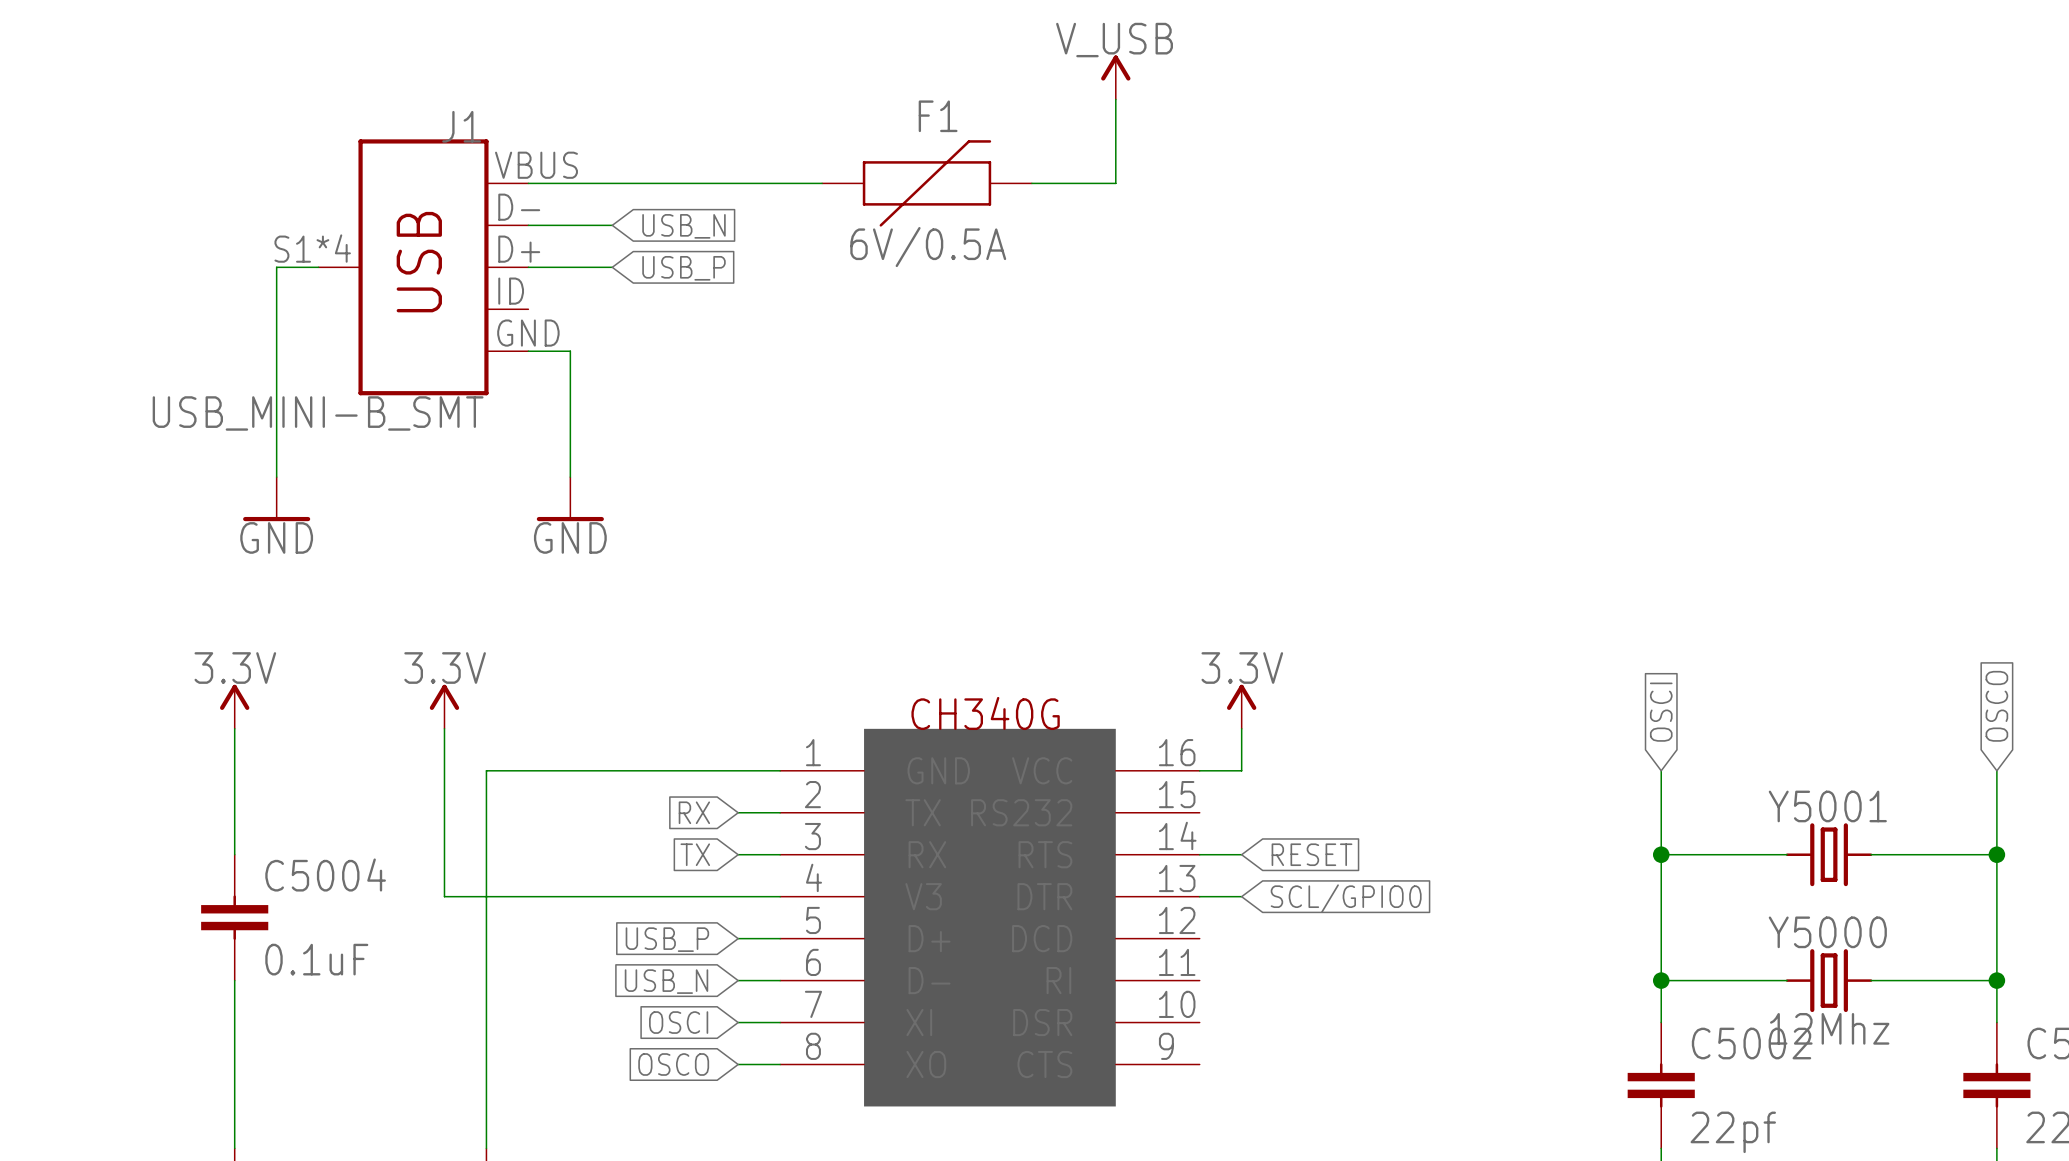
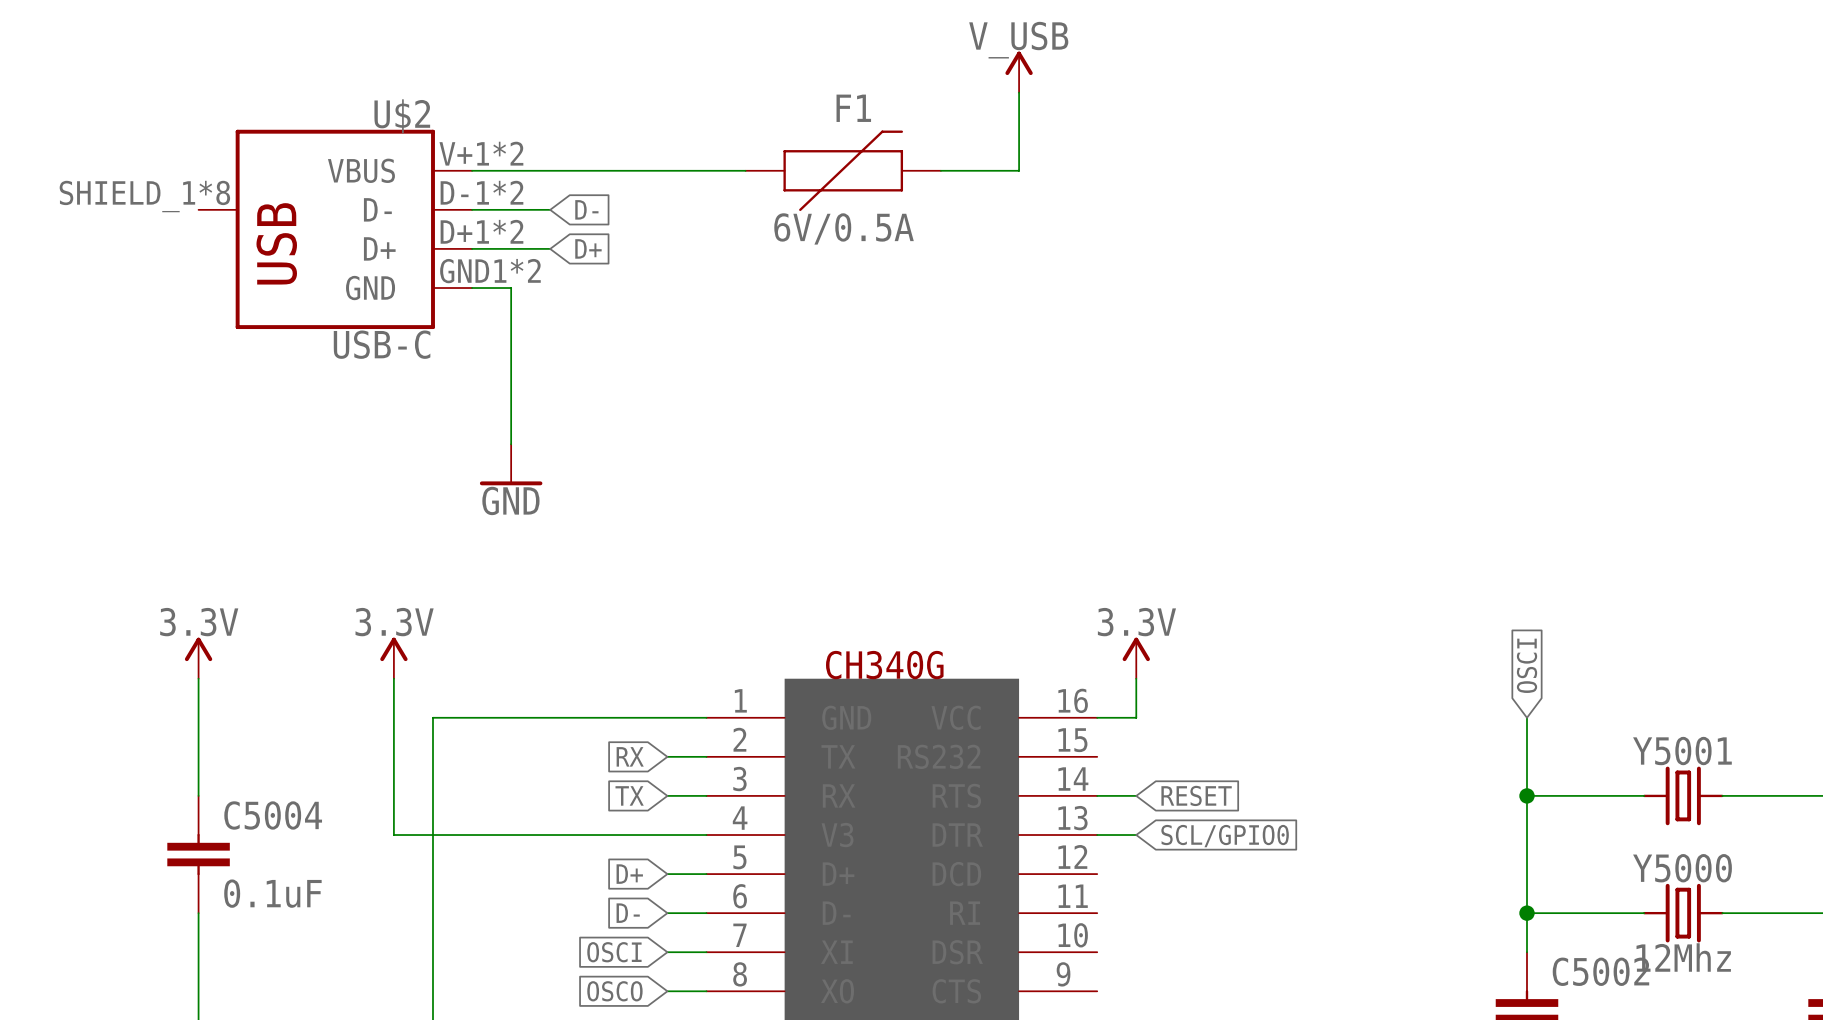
global label: USB_N (683, 226) -> D- (586, 209)
U$2: none -> USB-C (335, 229)
wire: (318, 267) (276, 267) (276, 477) -> none
J1: USB_MINI-B_SMT (423, 267) -> none
global label: USB_P (683, 268) -> D+ (588, 248)
wire: (528, 351) (570, 351) -> (472, 288) (511, 288) (511, 327)
power symbol: GND (276, 499) -> none
global label: USB_P (667, 939) -> D+ (629, 874)
global label: USB_N (666, 981) -> D- (628, 913)

